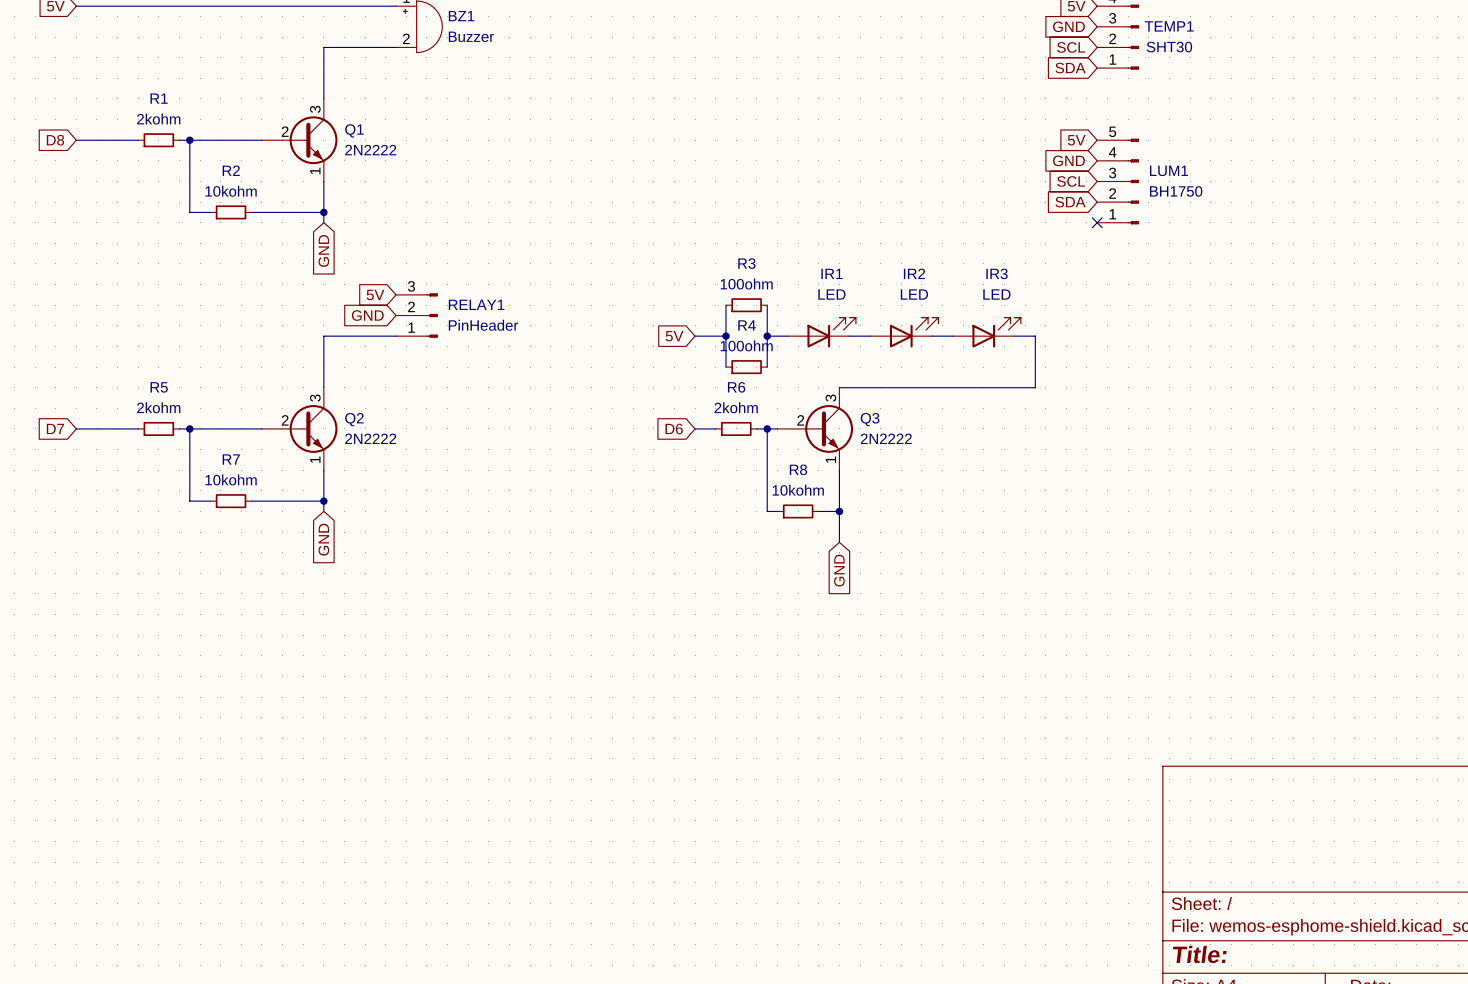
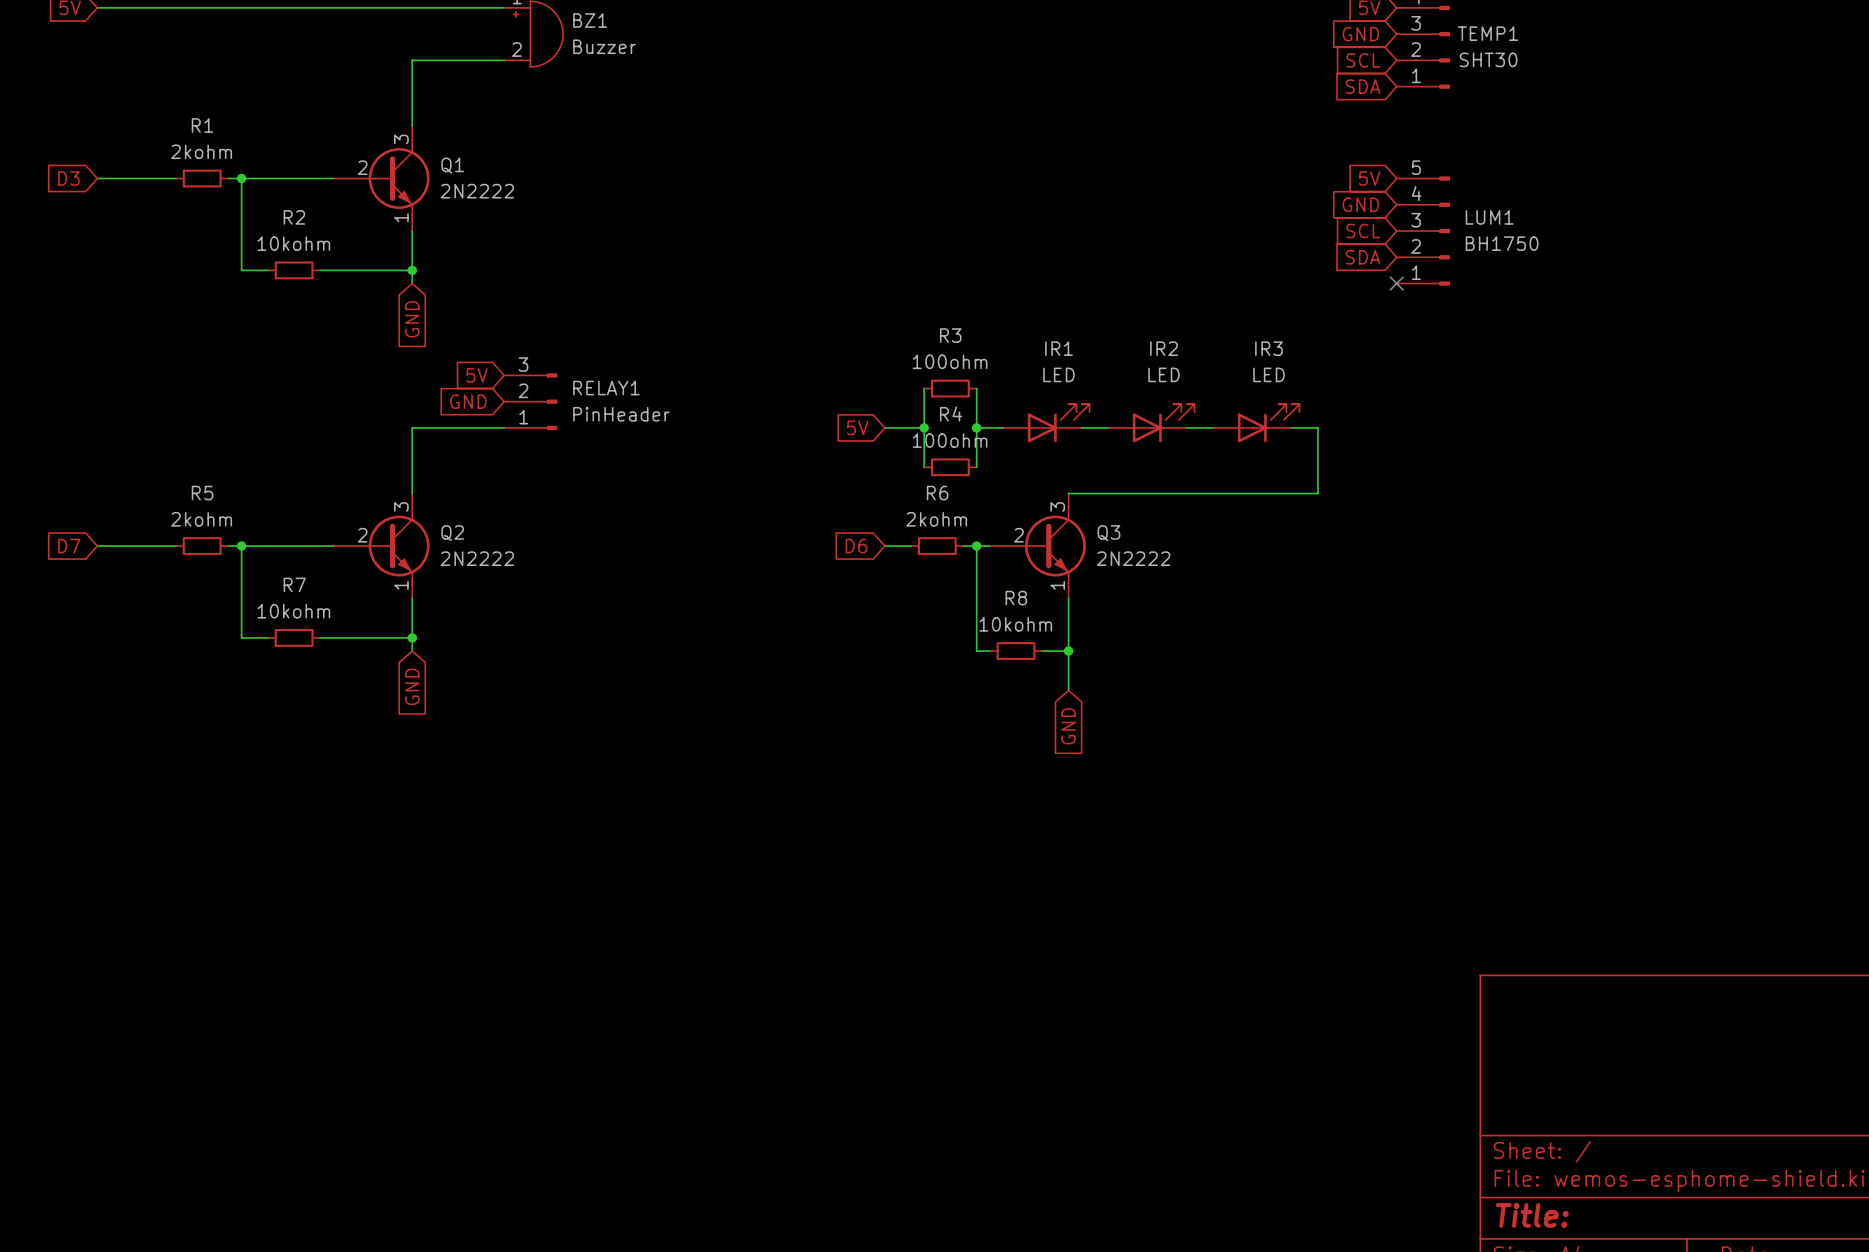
global label: D8 (55, 140) -> D3 (68, 178)

